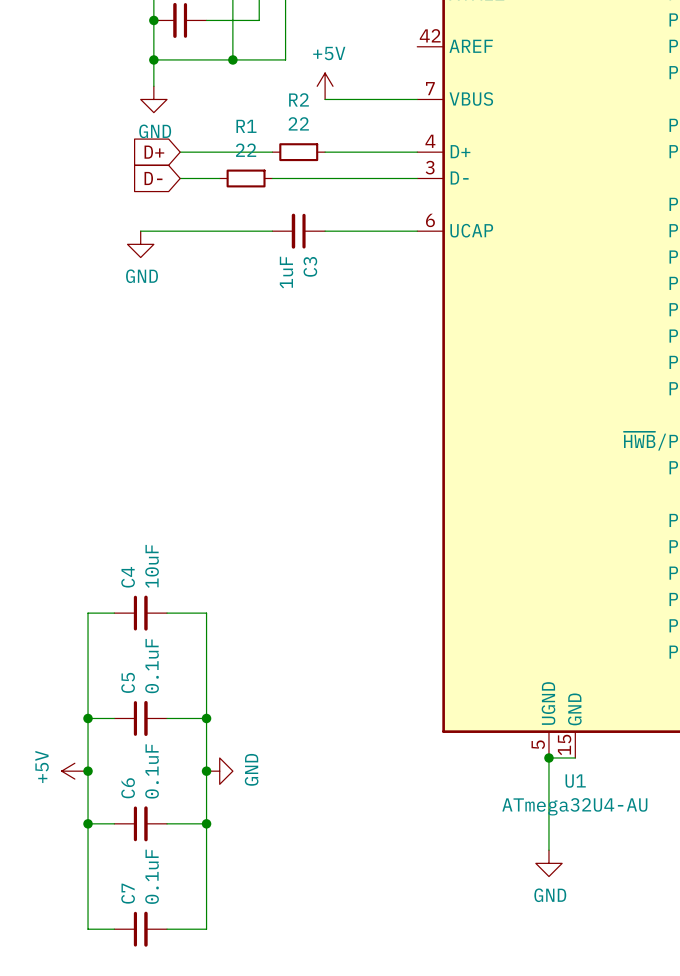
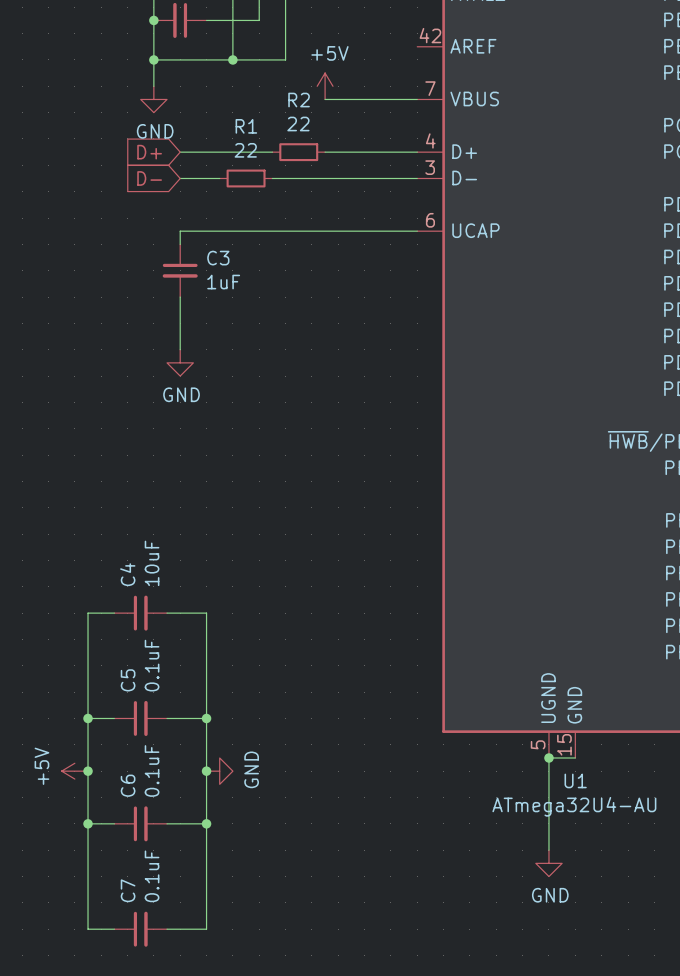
wire: (140, 231) (180, 231) -> (180, 244) (180, 231)
C3 rotation: 0° (298, 231) -> 90° counterclockwise (180, 270)
C3 position: (298, 231) -> (180, 270)
power symbol position: GND (140, 244) -> GND (180, 362)
wire: none -> (180, 297) (180, 349)

